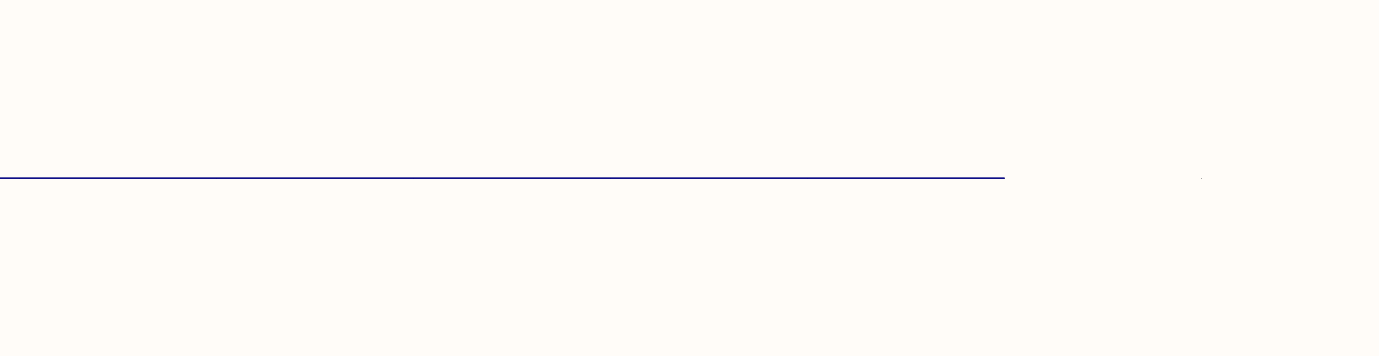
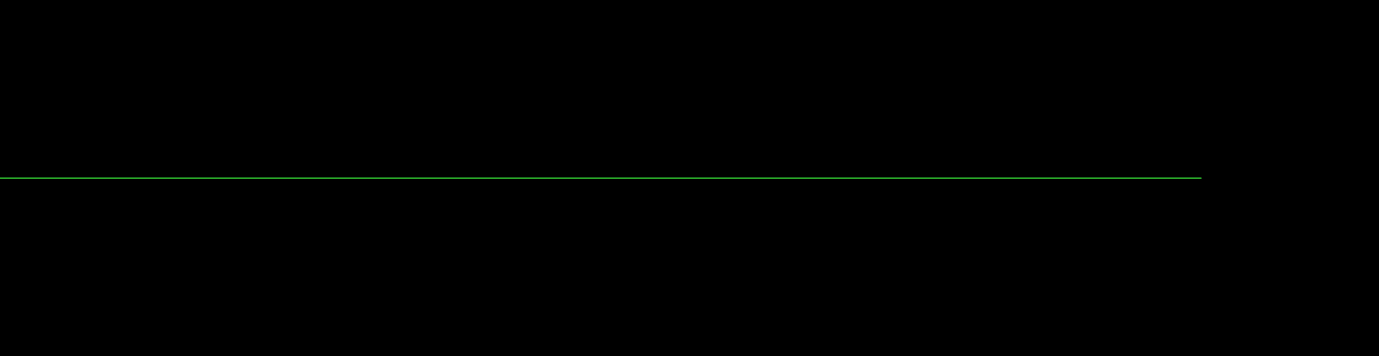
wire: none -> (1004, 178) (1201, 178)

